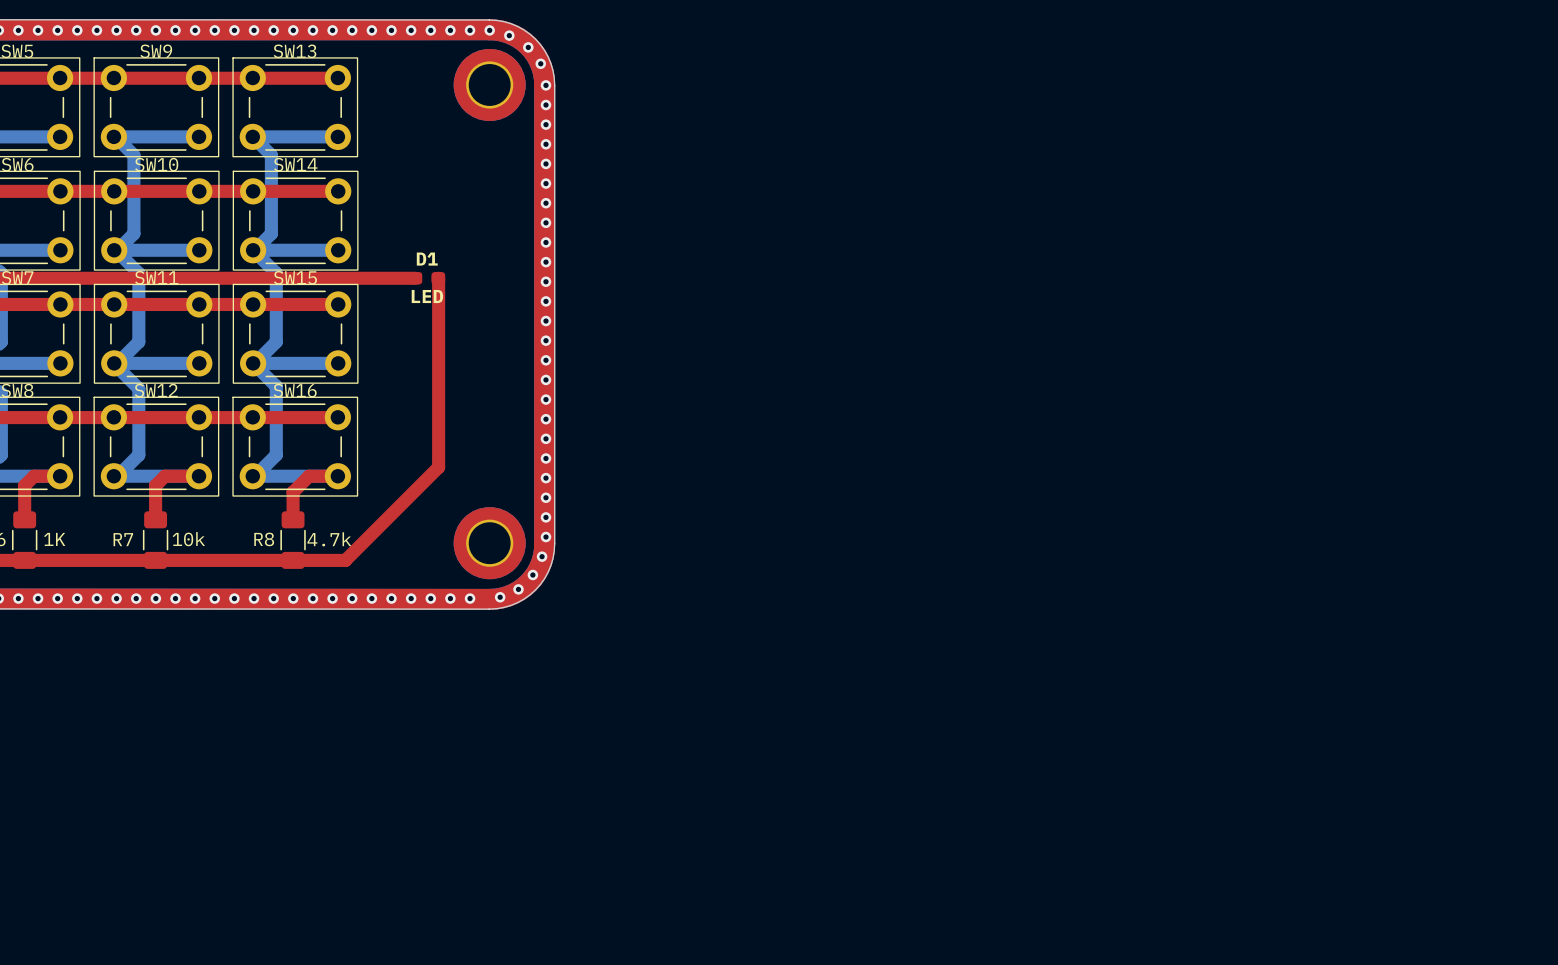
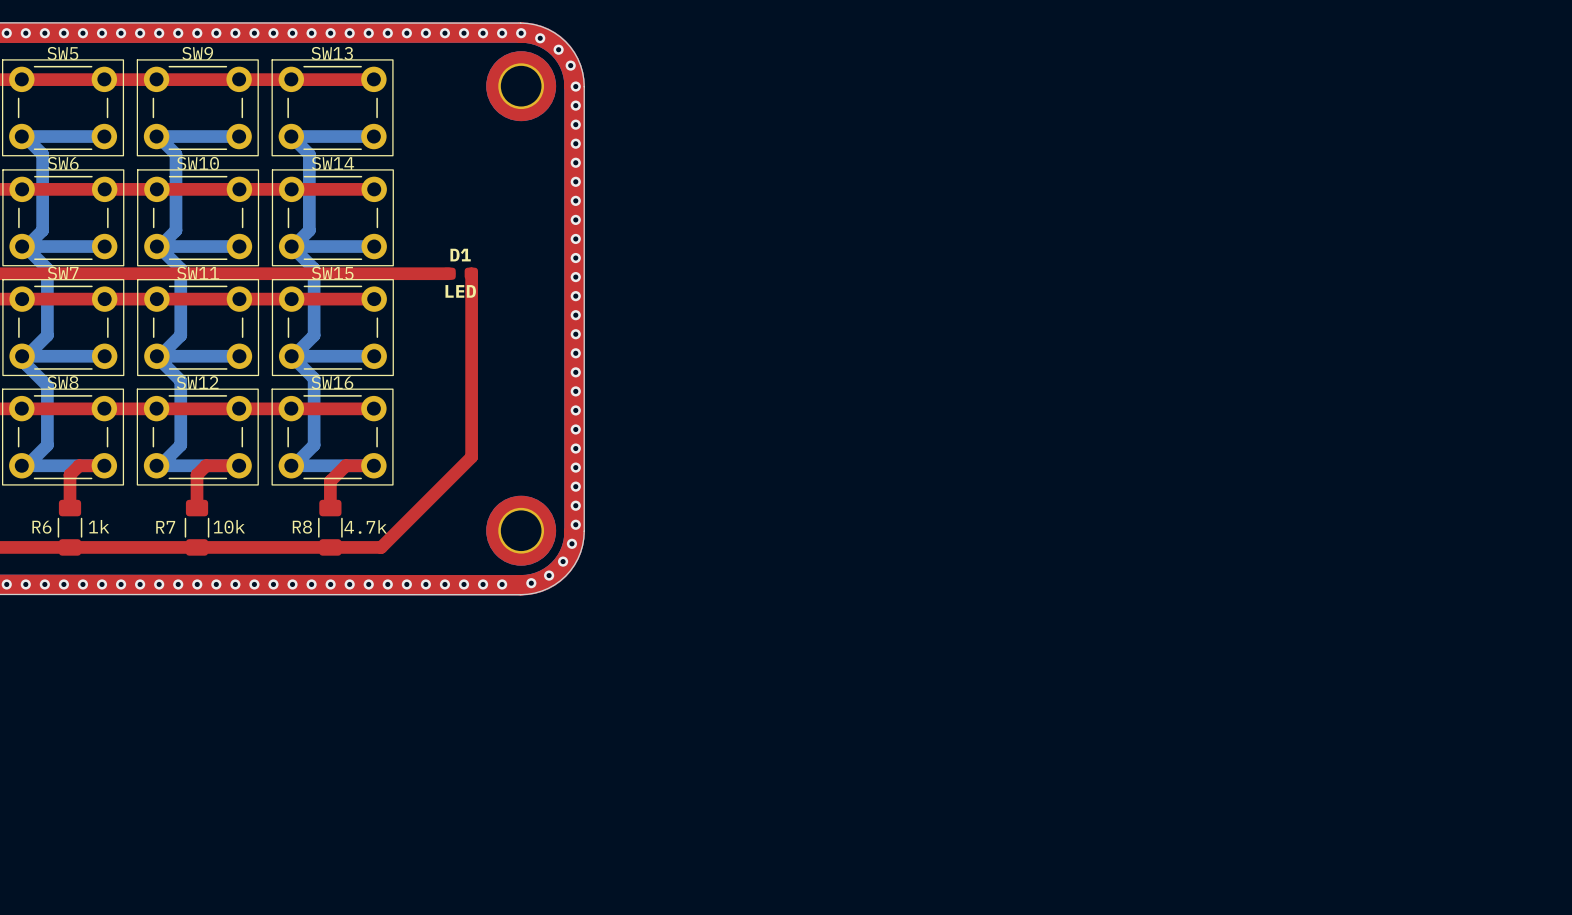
R6 value: 1K (54, 539) -> 1k (99, 526)

